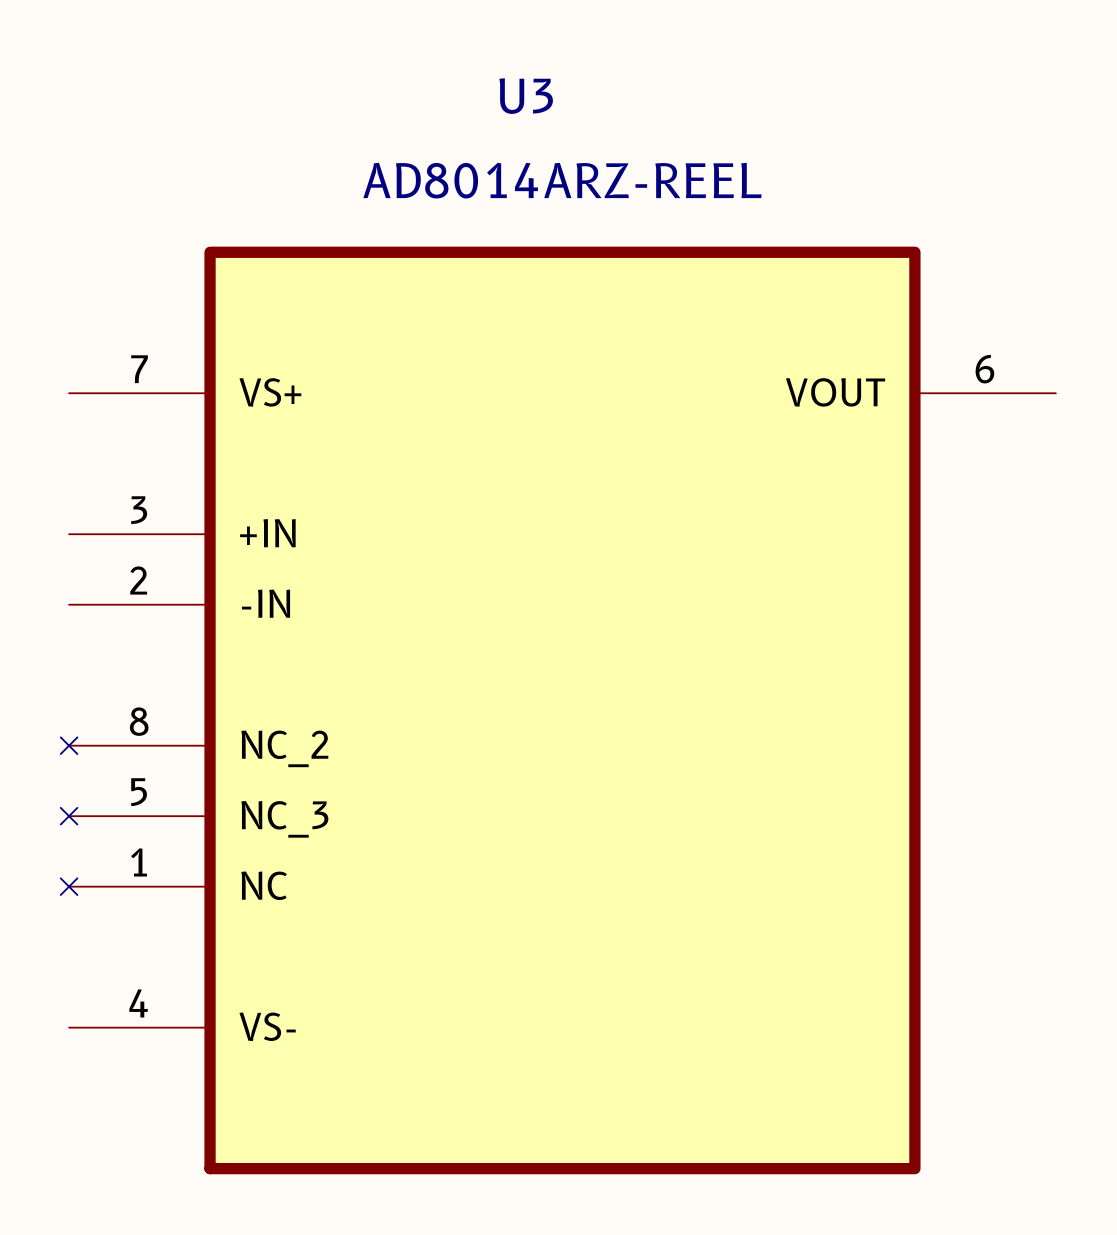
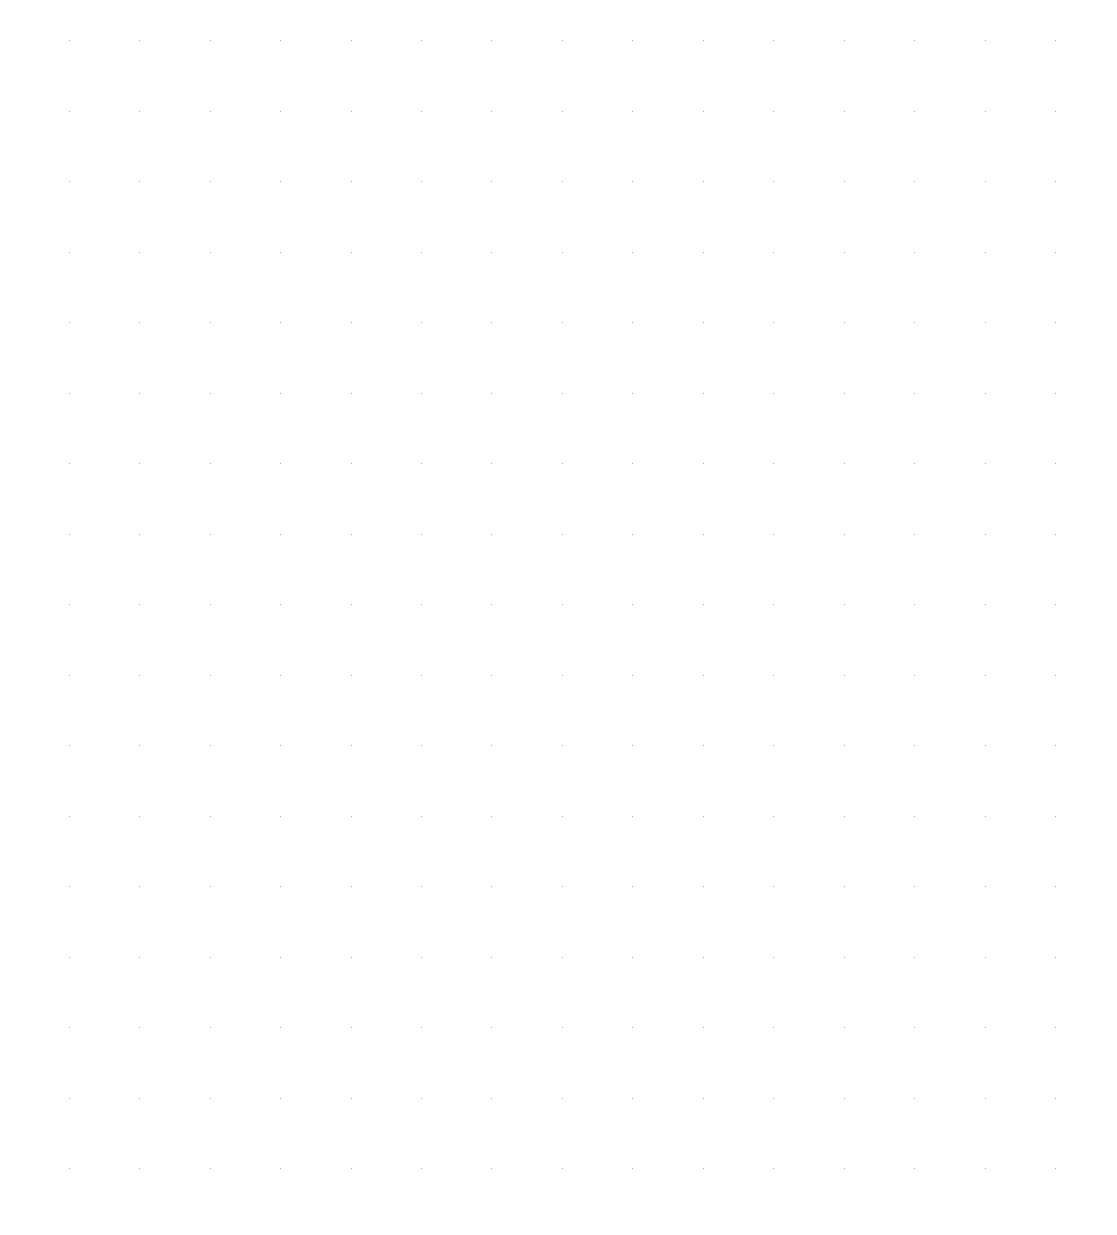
U3: AD8014ARZ-REEL (558, 710) -> none

